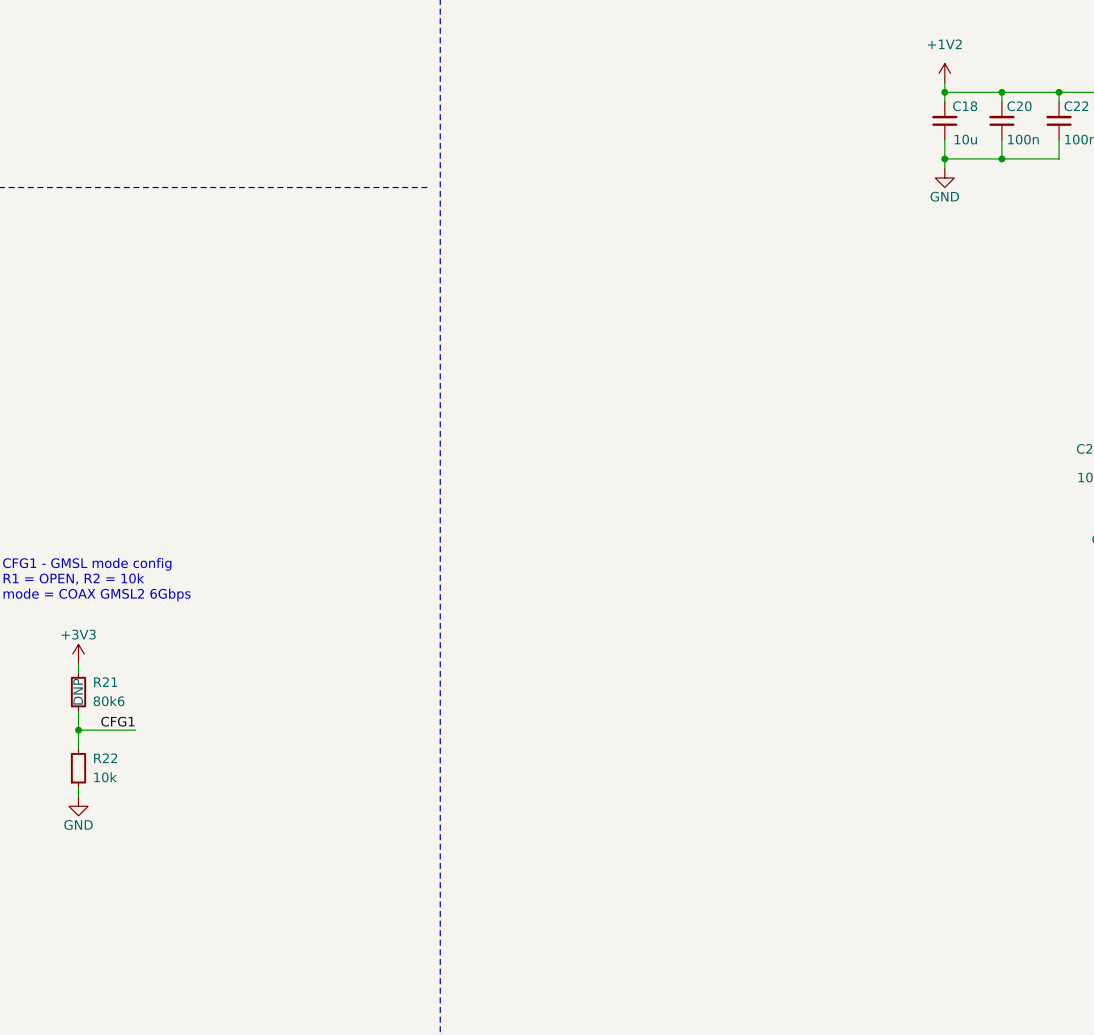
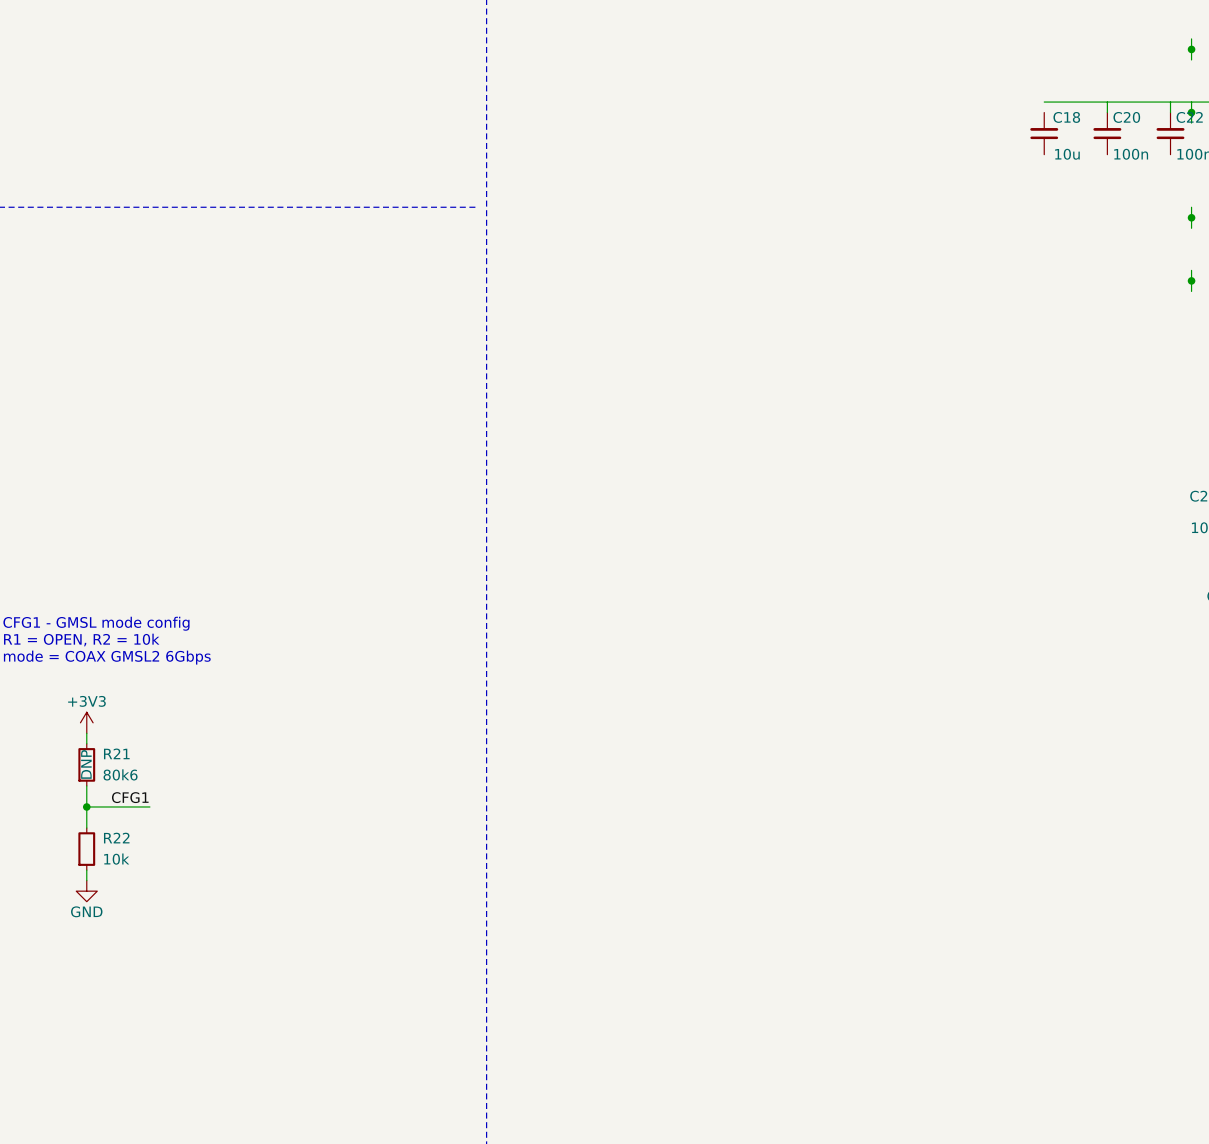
wire: none -> (1191, 38) (1191, 59)
junction: none -> (1191, 49)
power symbol: +1V2 (944, 73) -> none
wire: (944, 82) (944, 101) -> (1191, 102) (1191, 123)
junction: (944, 92) -> none
junction: (1001, 92) -> none
junction position: (1059, 92) -> (1191, 112)
wire: (944, 139) (944, 168) -> none
wire: (1001, 139) (1001, 158) -> (1191, 207) (1191, 228)
wire: (1059, 139) (1059, 158) (944, 158) -> none
junction: (944, 158) -> none
junction: (1001, 158) -> none
power symbol: GND (944, 178) -> none
junction: none -> (1191, 217)
wire: none -> (1191, 270) (1191, 291)
junction: none -> (1191, 280)

